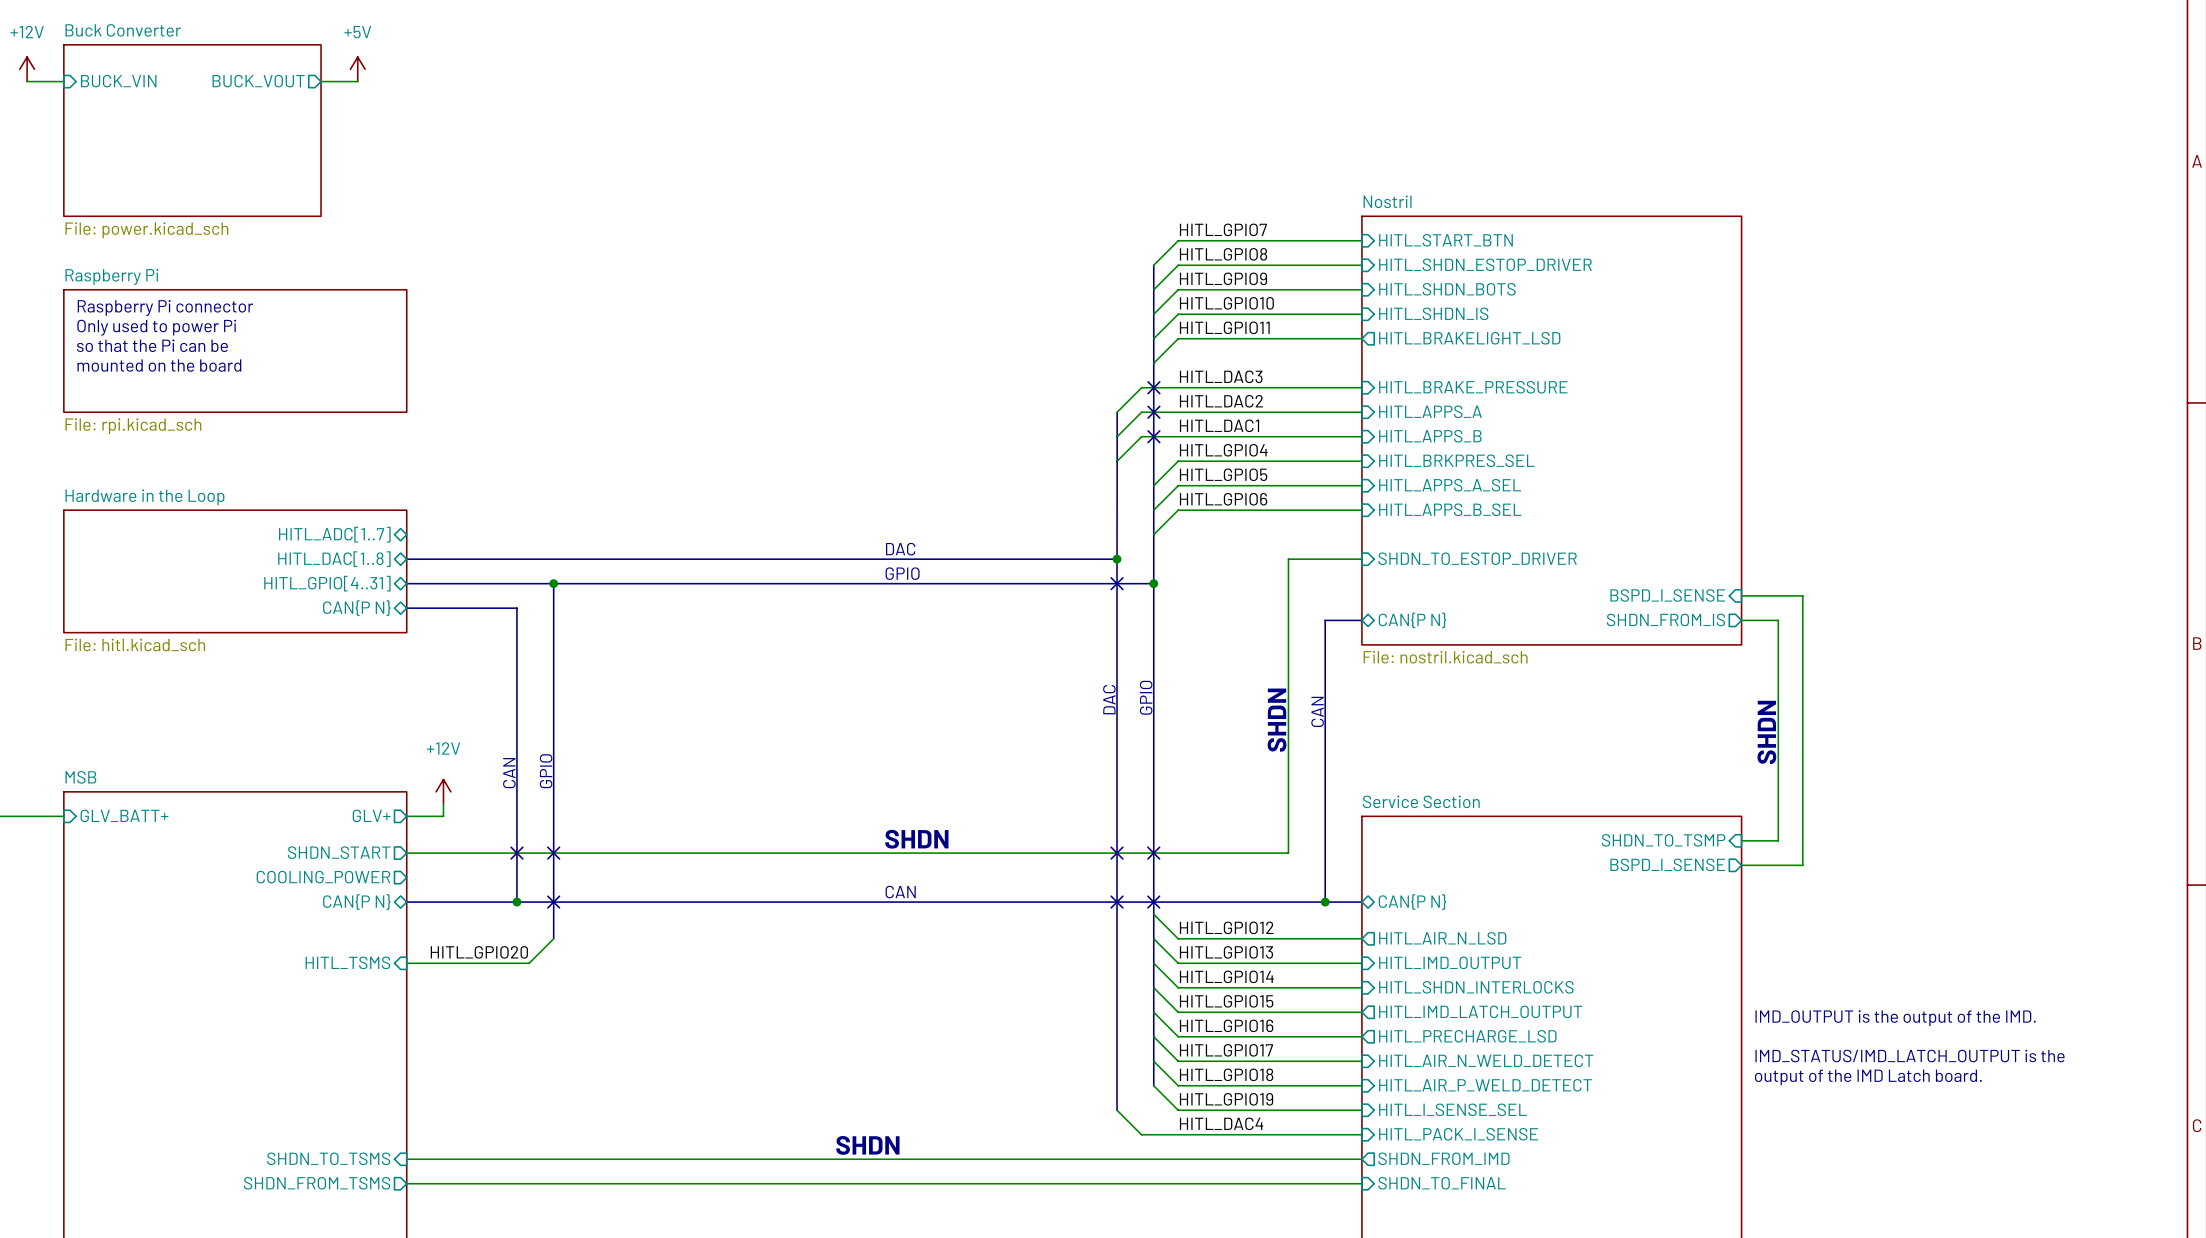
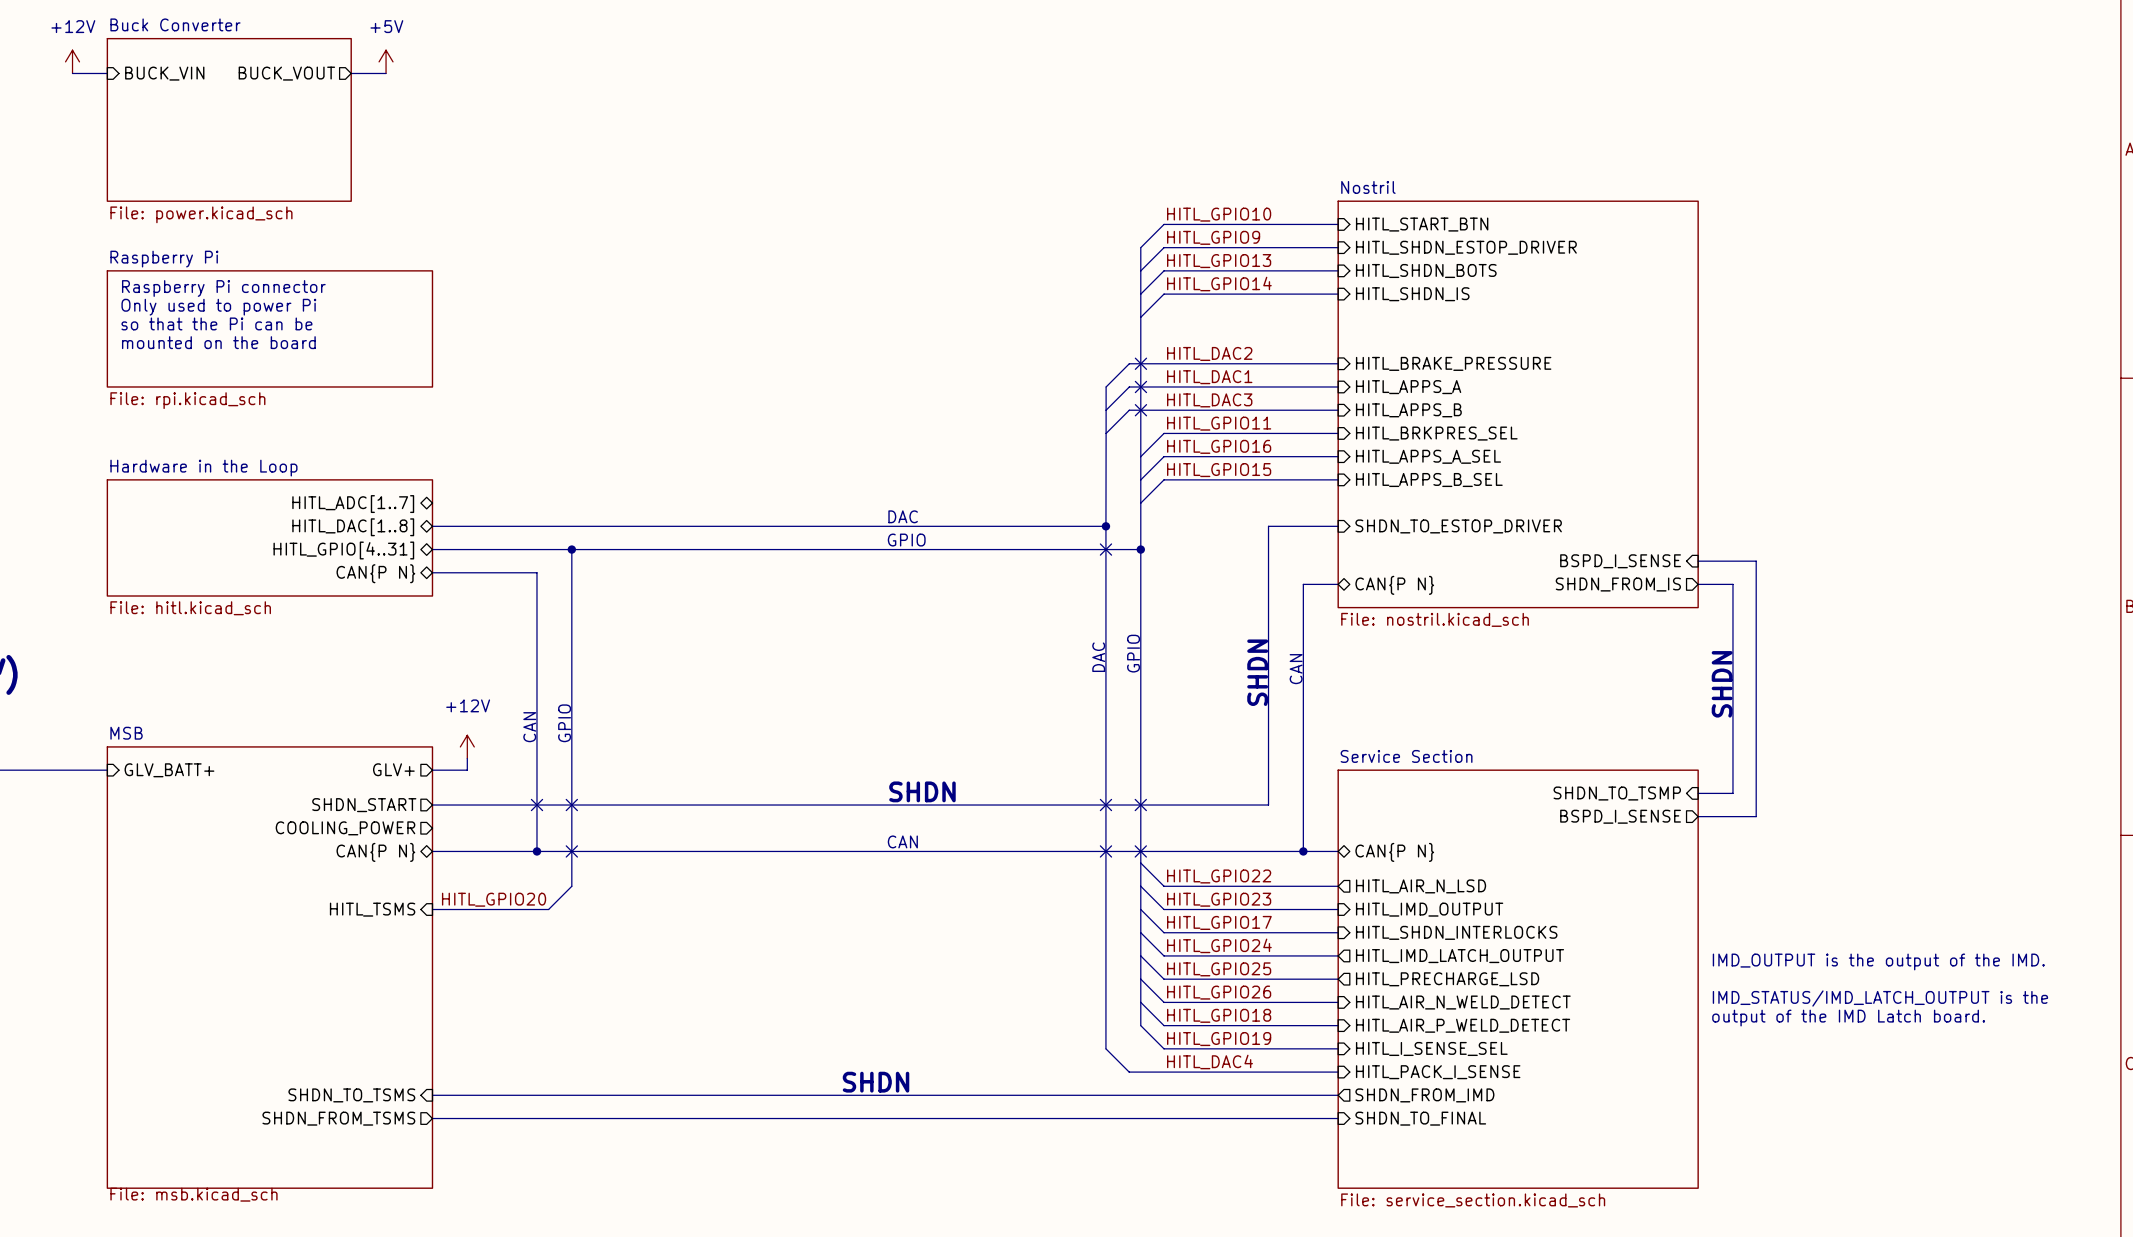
label: HITL_GPIO7 (1223, 229) -> HITL_GPIO10 (1219, 214)
label: HITL_GPIO8 (1223, 254) -> HITL_GPIO9 (1213, 237)
label: HITL_GPIO9 (1223, 278) -> HITL_GPIO13 (1219, 261)
label: HITL_GPIO10 (1226, 303) -> HITL_GPIO14 (1219, 284)
label: HITL_GPIO11 (1224, 327) -> none
wire: (1361, 338) (1178, 338) (1153, 363) -> none
sheet pin: HITL_BRAKELIGHT_LSD (1469, 338) -> none
label: HITL_DAC3 (1221, 376) -> HITL_DAC2 (1209, 353)
label: HITL_DAC2 (1221, 401) -> HITL_DAC1 (1209, 377)
label: HITL_DAC1 (1219, 425) -> HITL_DAC3 (1209, 400)
label: HITL_GPIO4 (1223, 450) -> HITL_GPIO11 (1219, 423)
label: HITL_GPIO5 (1223, 474) -> HITL_GPIO16 (1219, 446)
label: HITL_GPIO6 (1223, 499) -> HITL_GPIO15 (1219, 470)
label: HITL_GPIO12 (1226, 927) -> HITL_GPIO22 (1219, 876)
label: HITL_GPIO13 (1226, 952) -> HITL_GPIO23 (1219, 899)
label: HITL_GPIO14 (1226, 976) -> HITL_GPIO17 (1219, 922)
label: HITL_GPIO15 (1226, 1001) -> HITL_GPIO24 (1219, 945)
label: HITL_GPIO16 (1226, 1025) -> HITL_GPIO25 (1219, 969)
label: HITL_GPIO17 (1226, 1050) -> HITL_GPIO26 (1219, 992)

